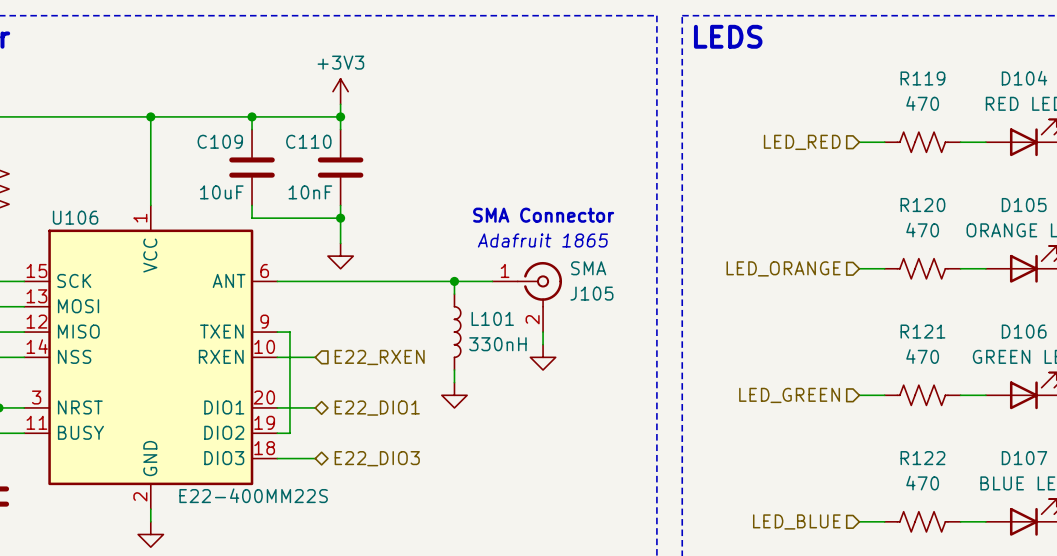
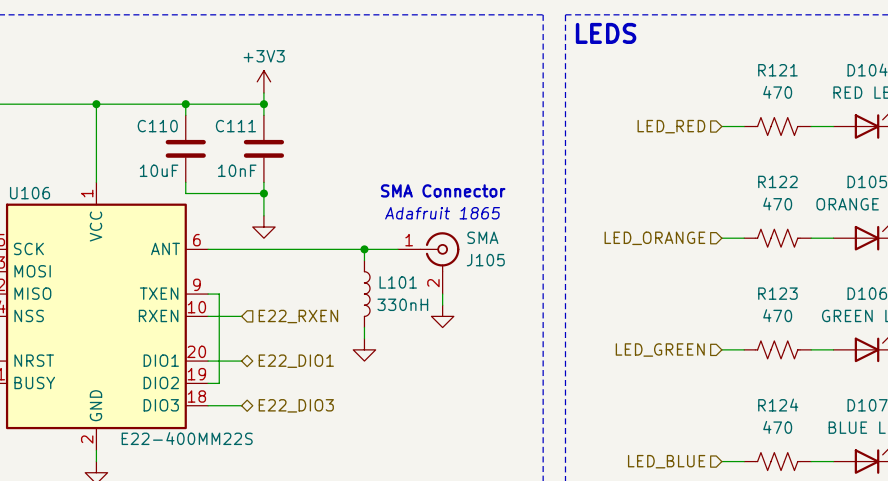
R119 name: R119 (922, 78) -> R121 (777, 70)
C109 name: C109 (220, 141) -> C110 (157, 126)
C110 name: C110 (308, 141) -> C111 (235, 126)
R120 name: R120 (922, 205) -> R122 (777, 181)
R121 name: R121 (922, 331) -> R123 (777, 293)
R122 name: R122 (922, 458) -> R124 (778, 405)

